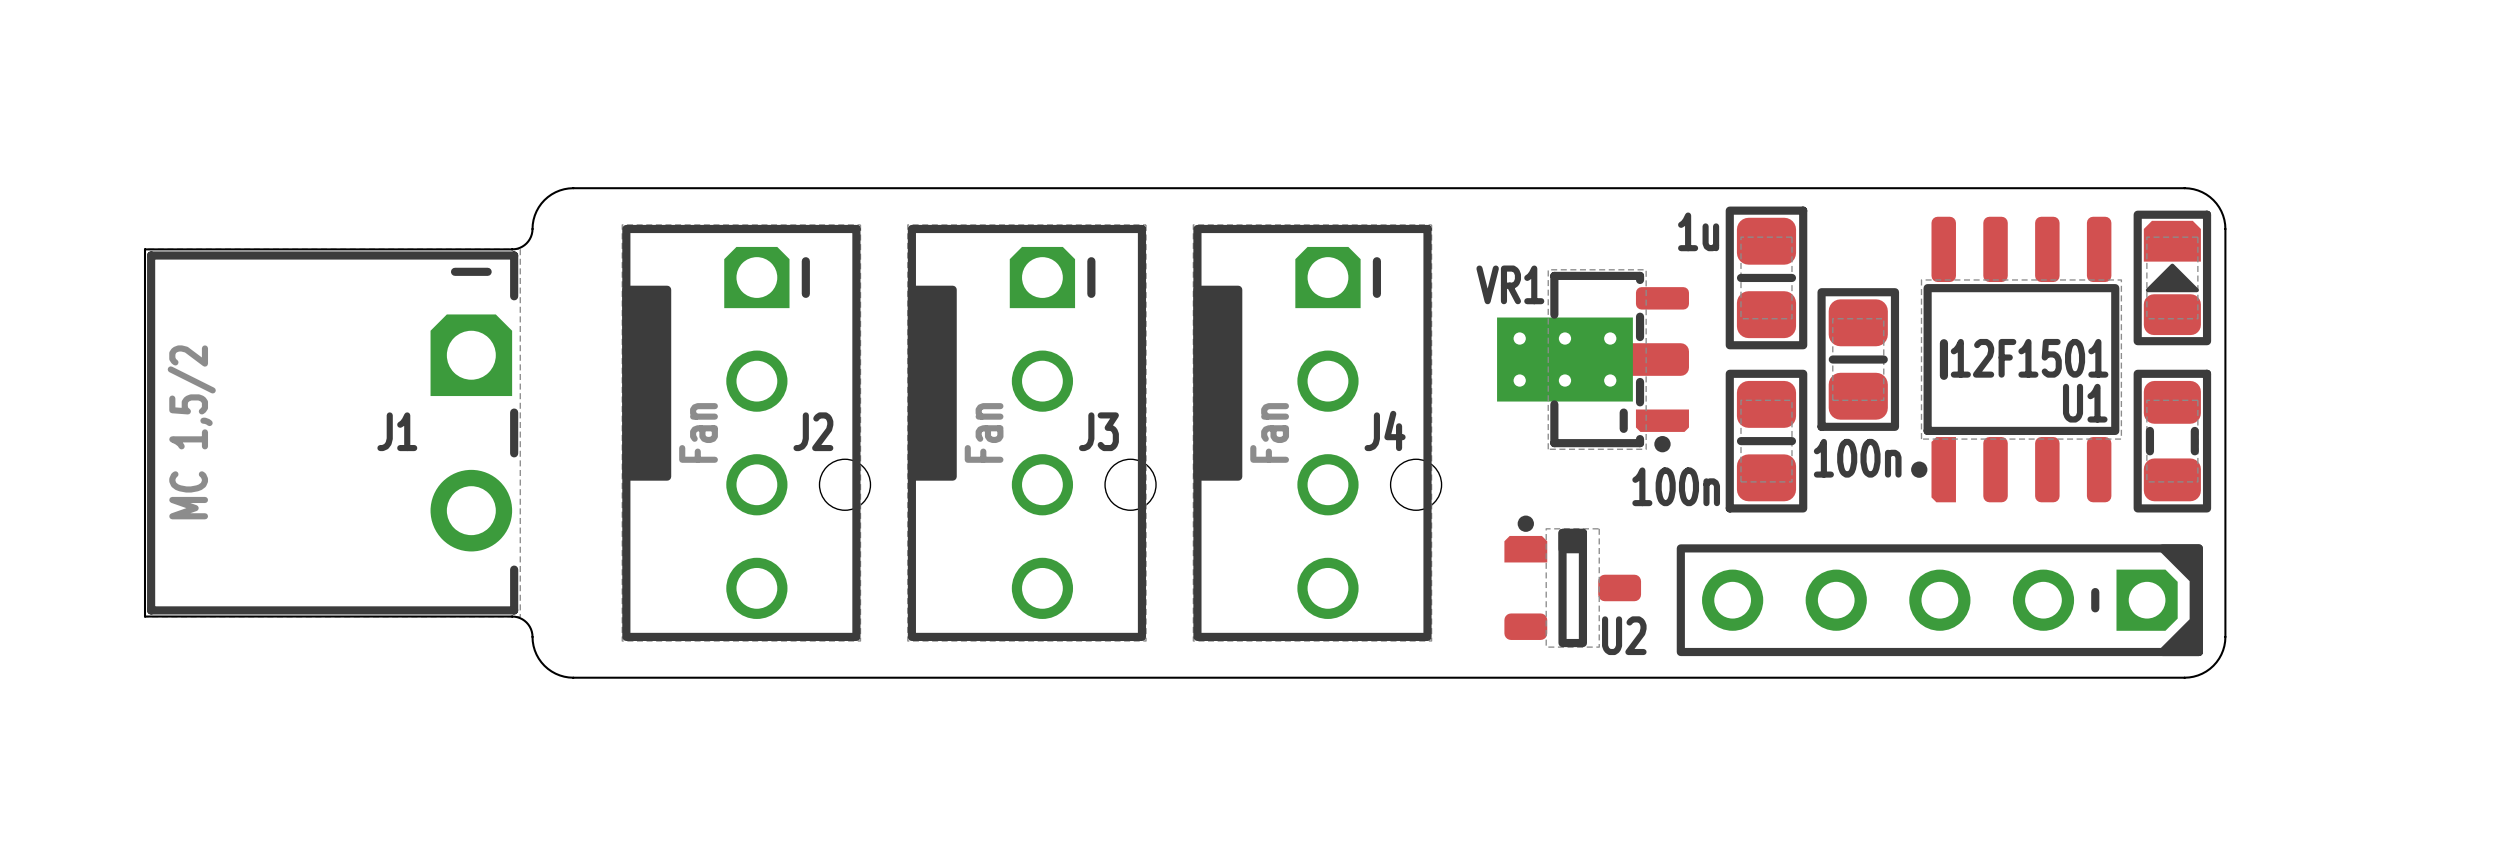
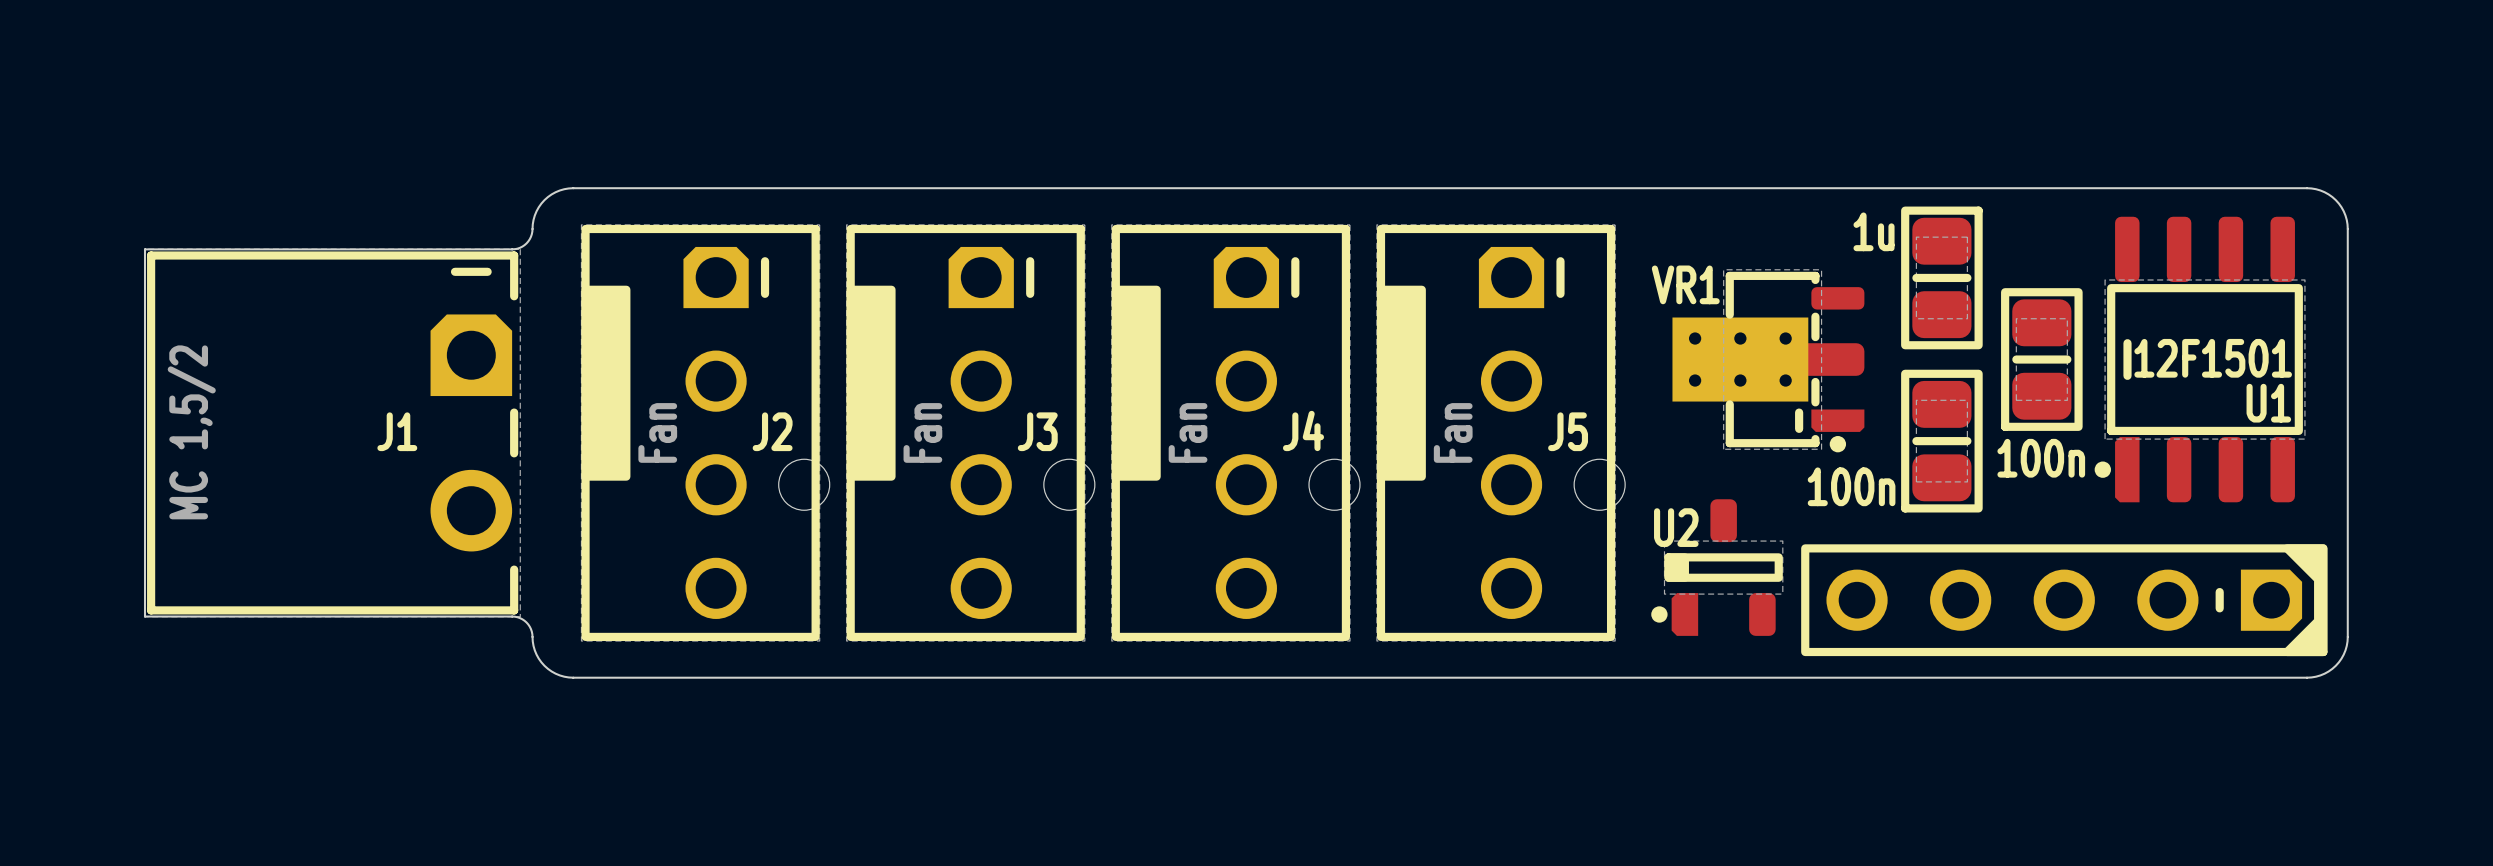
board edge: (2184, 188) (2198, 190) (2213, 200) (2221, 211) (2225, 228) (2225, 641) (2219, 658) (2210, 668) (2198, 675) (2184, 677) -> (2184, 188) (2316, 189) (2328, 194) (2338, 203) (2345, 215) (2347, 228) (2347, 636) (2345, 650) (2341, 658) (2332, 668) (2324, 673) (2311, 677) (2184, 677)
part position: (1766, 277) -> (1941, 277)
part: (2172, 277) -> none
part: 100n (1858, 359) -> none
U1 position: (2016, 359) -> (2199, 359)
part: none -> 100n (2041, 359)
VR1 position: (1593, 360) -> (1768, 360)
J2 position: (746, 432) -> (705, 432)
J3 position: (1031, 432) -> (970, 432)
J4 position: (1317, 432) -> (1235, 432)
J5: none -> Fan (1500, 432)
part: 100n (1766, 441) -> none
part: none -> 100n (1941, 441)
part: (2172, 441) -> none
U2 rotation: 0° (1572, 581) -> 90° counterclockwise (1717, 567)
U2 position: (1572, 581) -> (1717, 567)
part position: (1939, 600) -> (2064, 600)
U2 name position: U2 (1624, 635) -> U2 (1676, 527)

